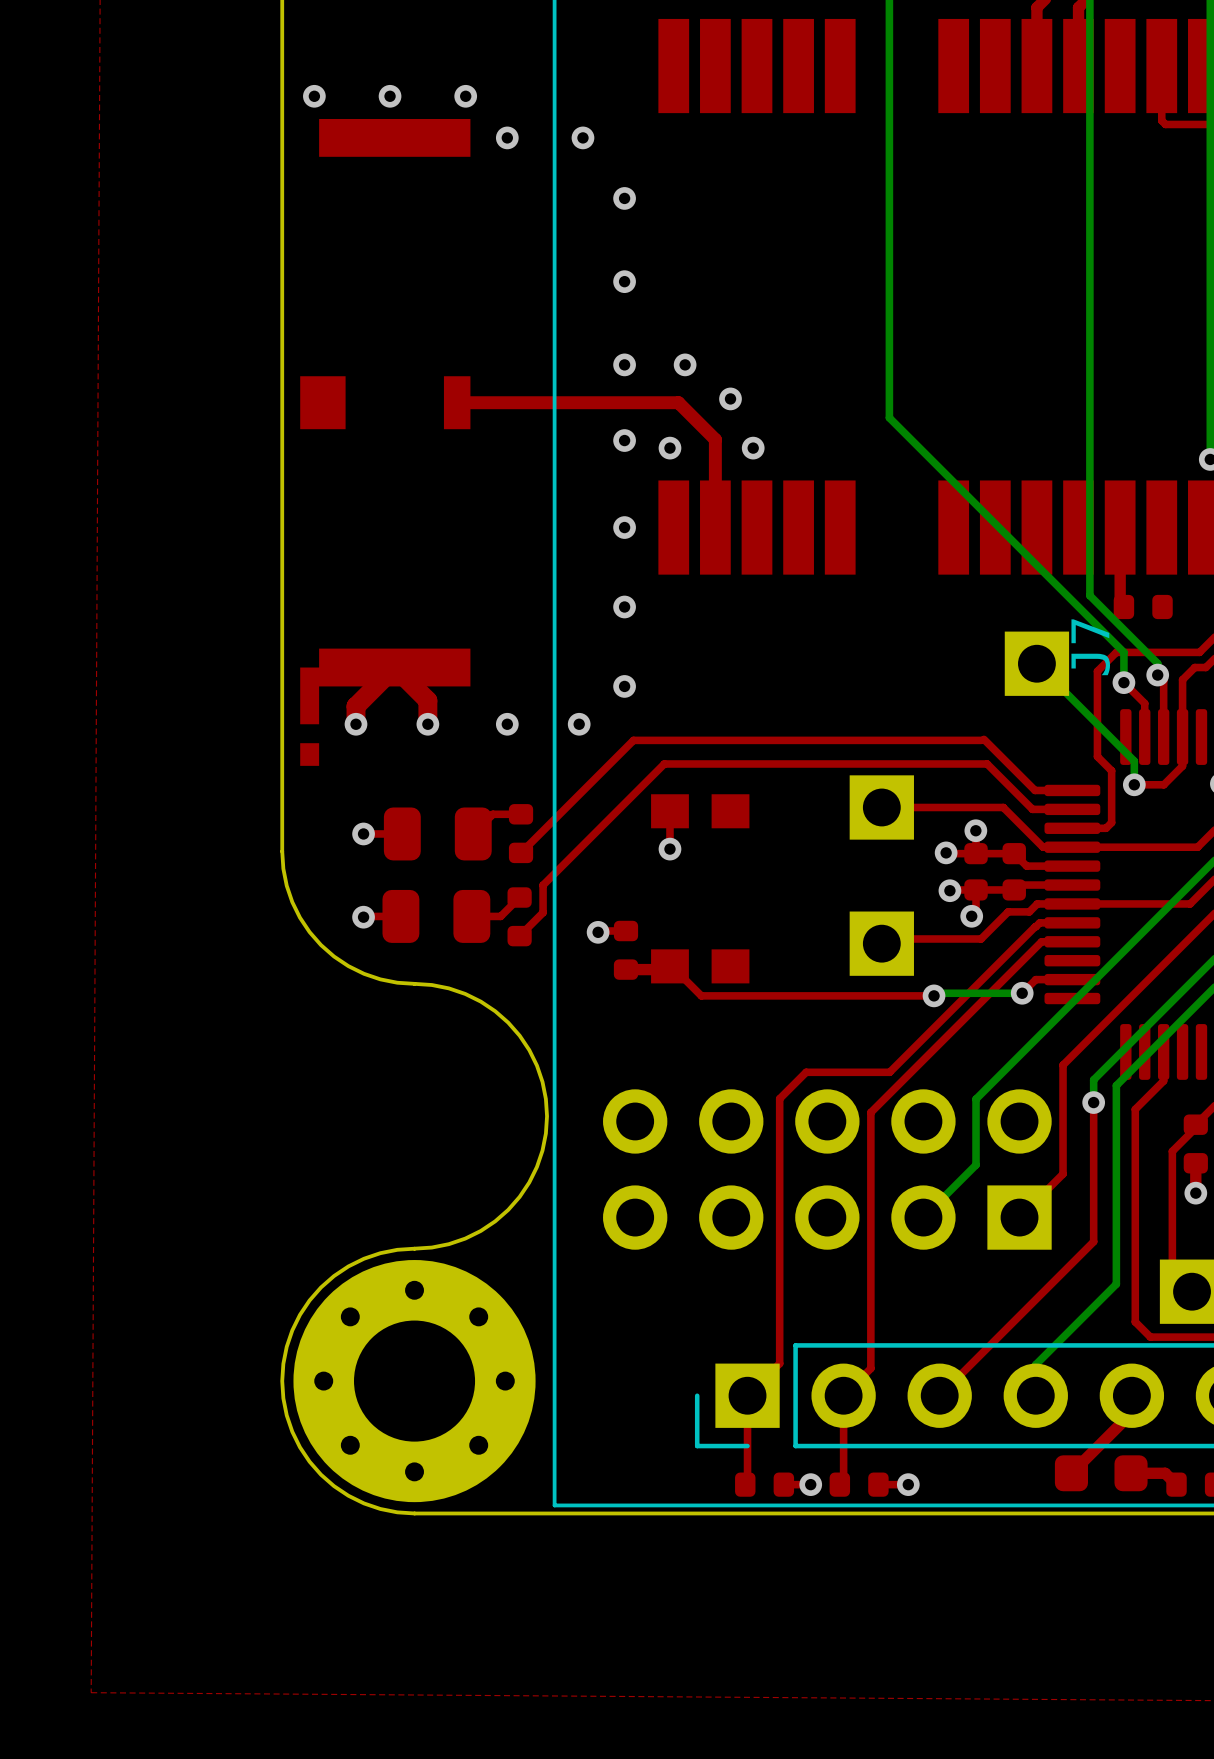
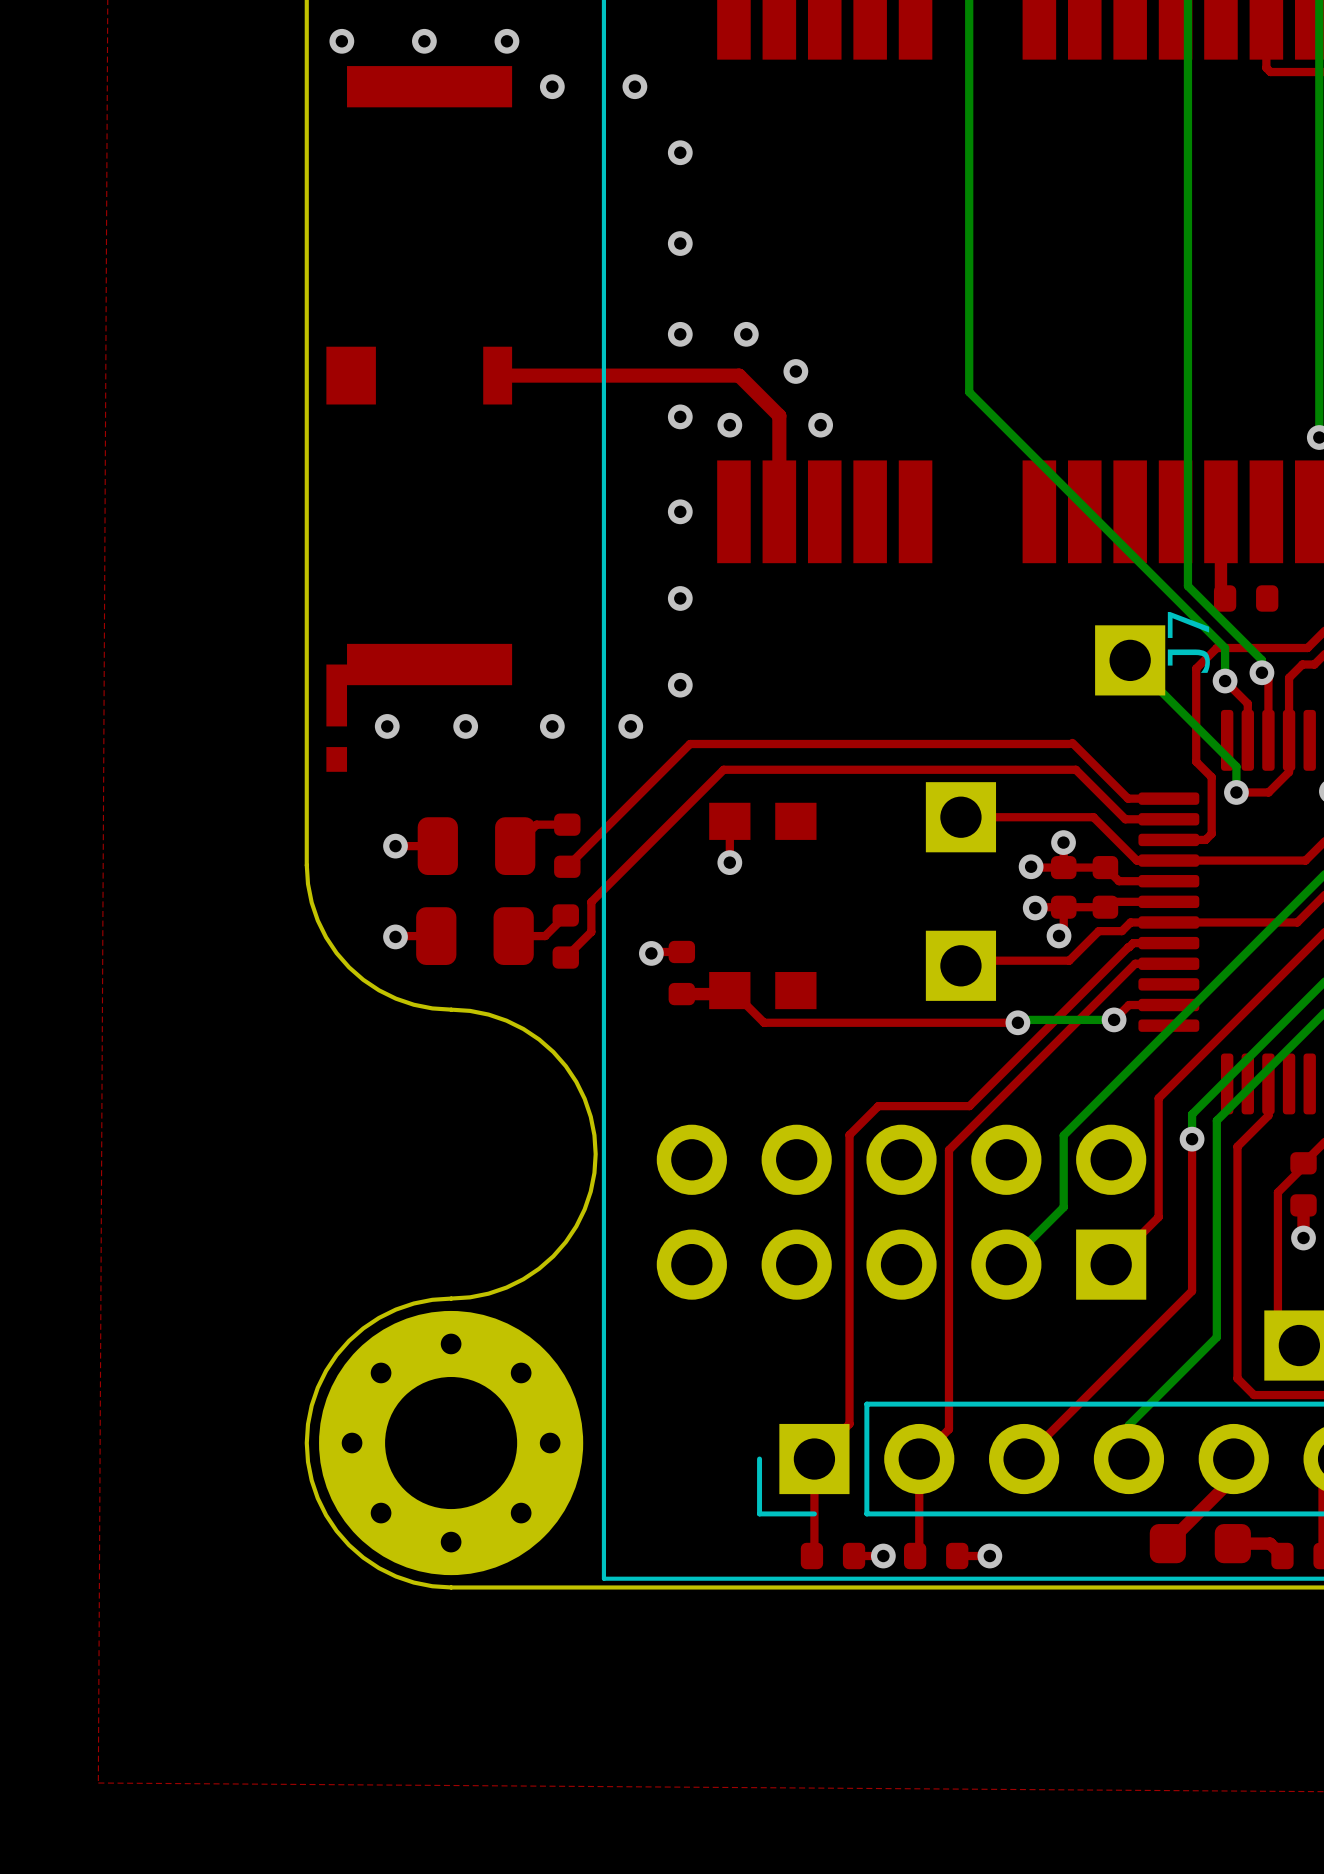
top track: (427, 724) (427, 700) (394, 667) (356, 706) (356, 724) -> none

